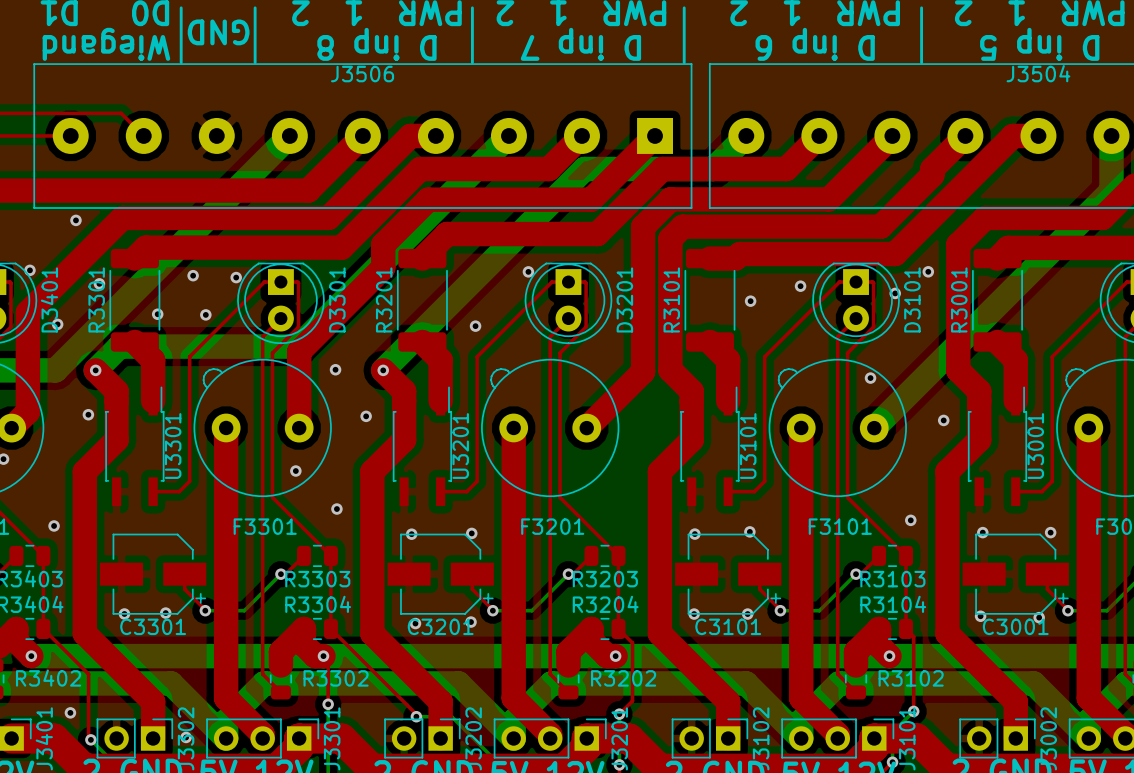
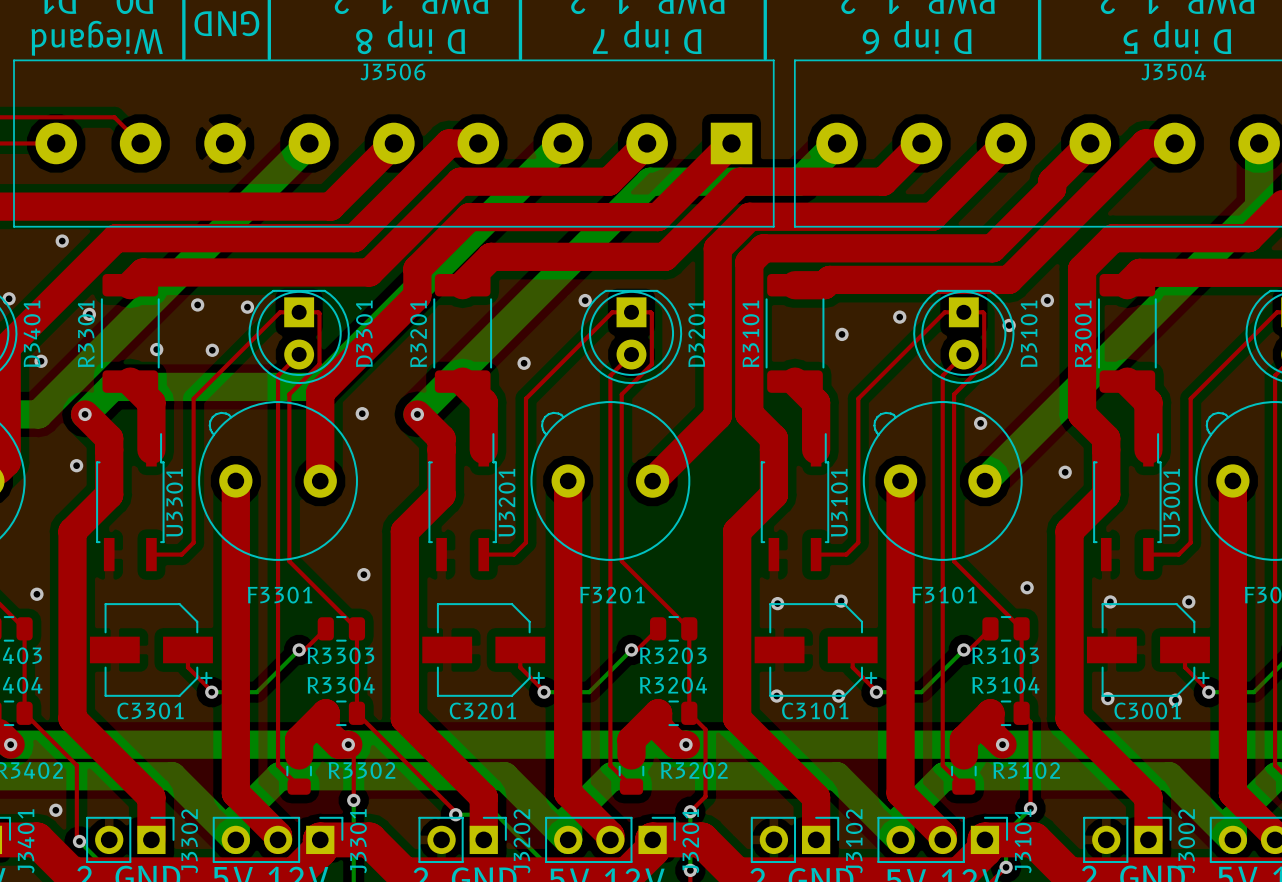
via: (366, 416) -> none
via: (295, 471) -> none
via: (471, 533) -> none
via: (411, 534) -> none
via: (124, 613) -> none
via: (165, 613) -> none
via: (471, 622) -> none
via: (415, 623) -> none
via: (186, 737) -> none

